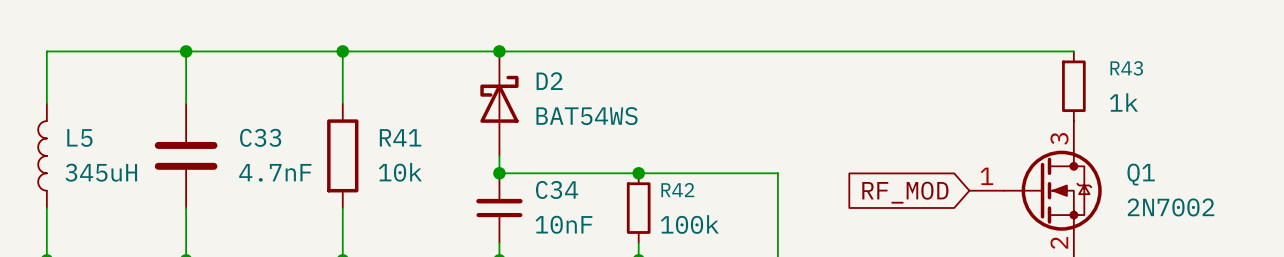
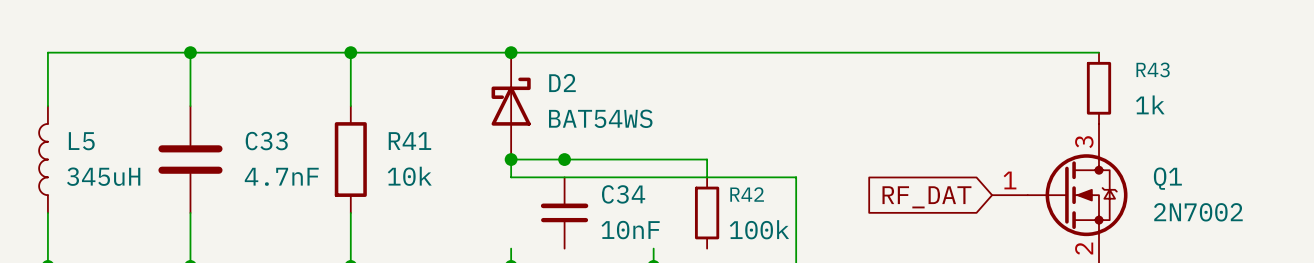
wire: none -> (511, 159) (707, 159) (707, 177)
junction: none -> (564, 159)
junction position: (499, 173) -> (511, 159)
junction: (638, 173) -> none
global label: RF_MOD (905, 192) -> RF_DAT (926, 197)
C34 position: (499, 208) -> (564, 212)
R42 position: (638, 208) -> (707, 212)

